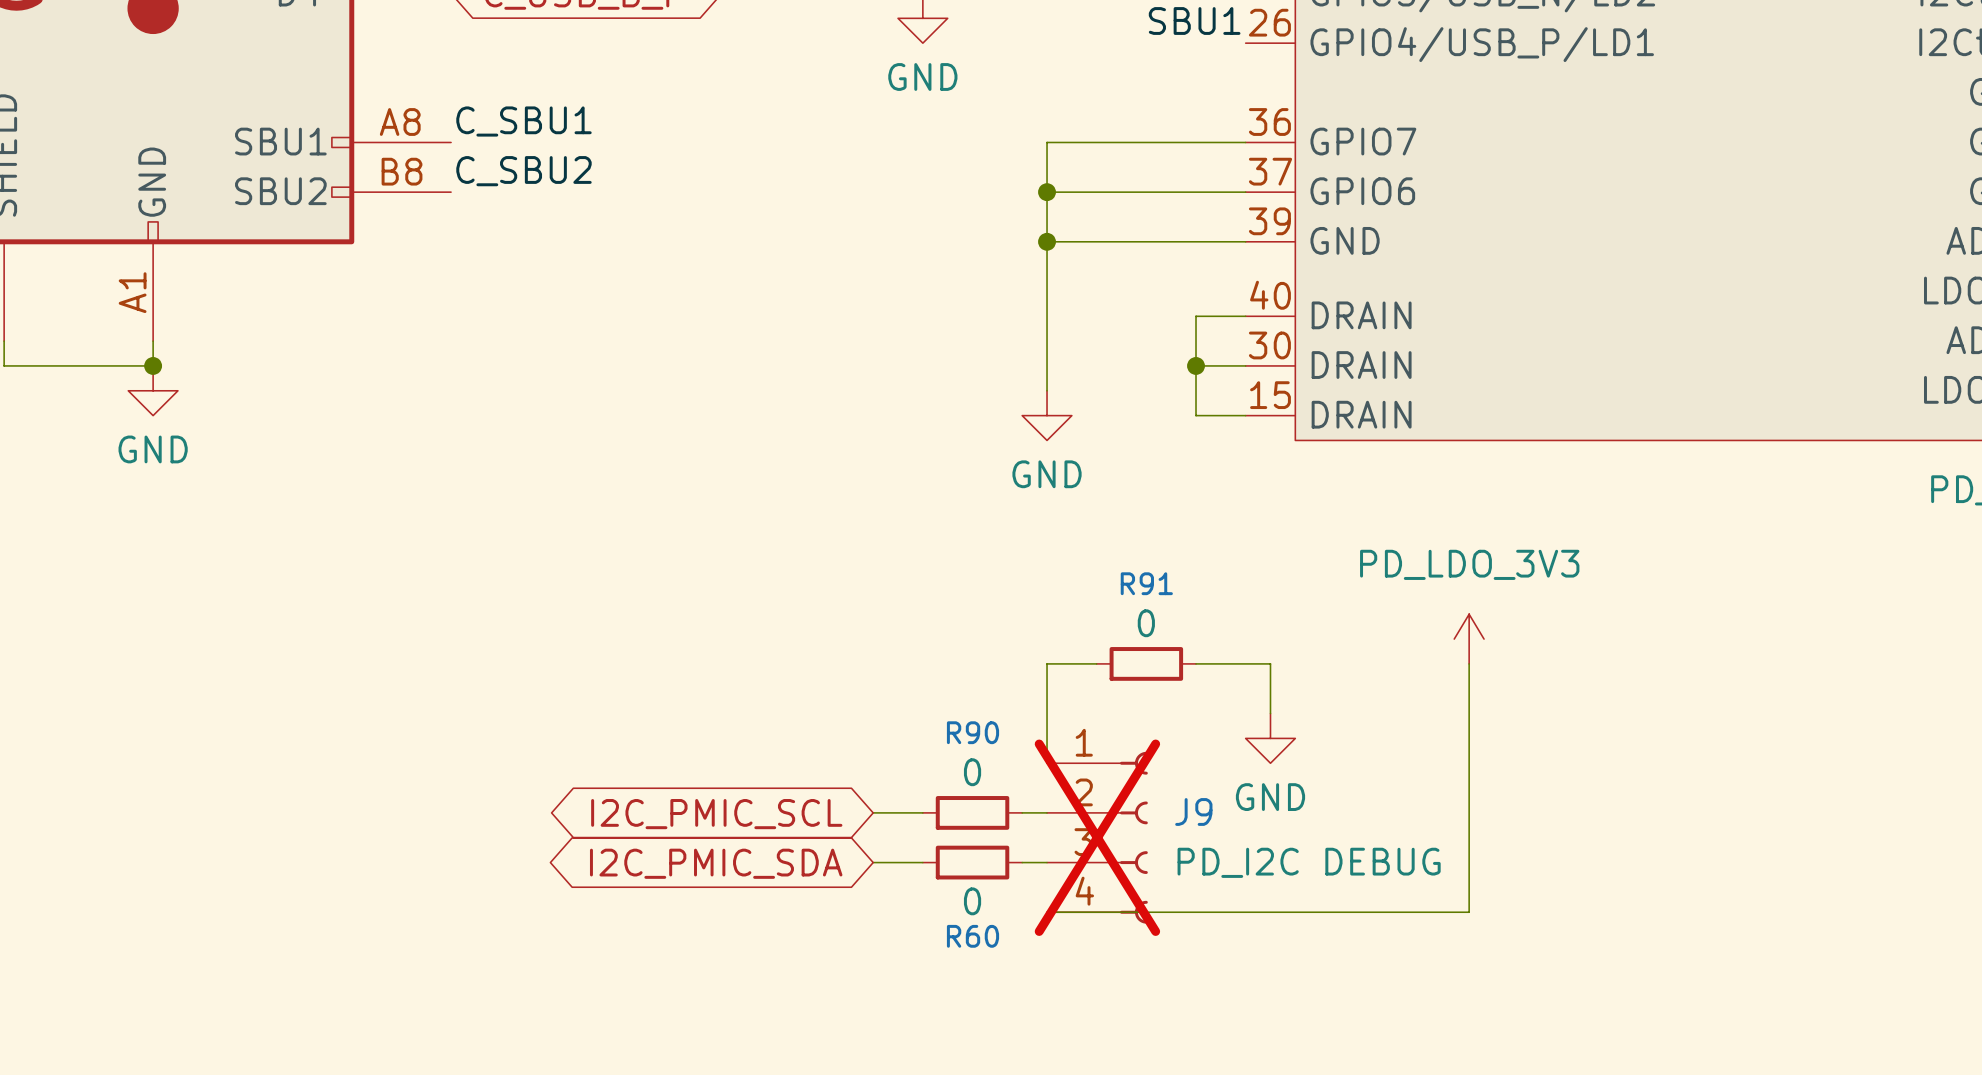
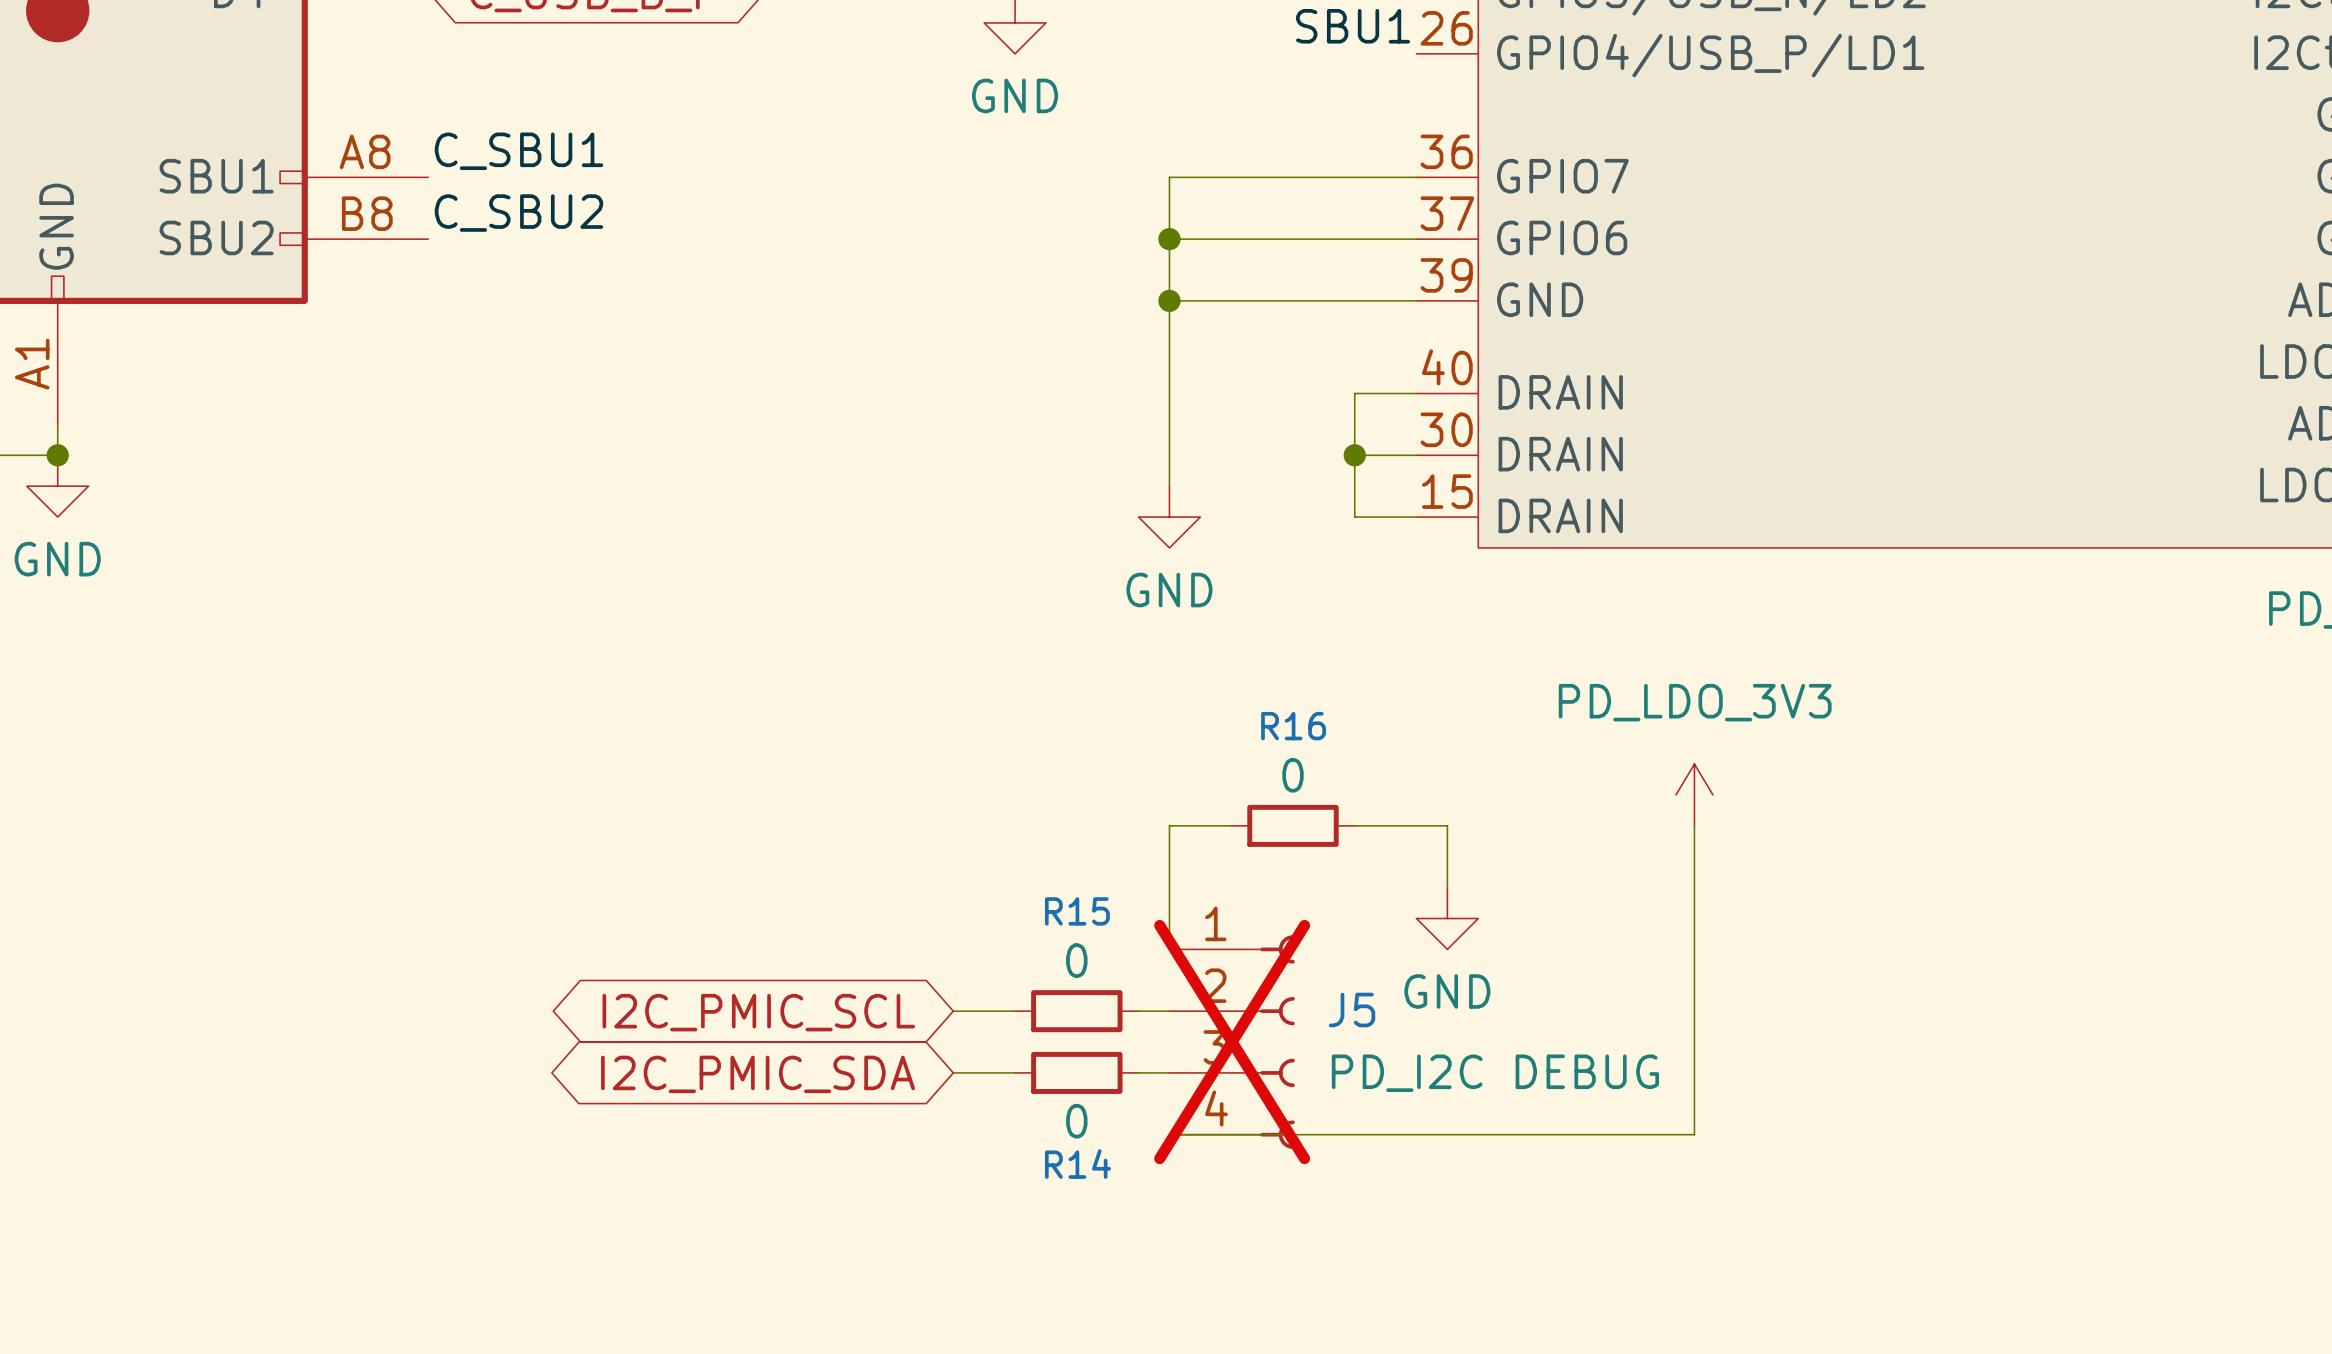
R91 name: R91 (1146, 583) -> R16 (1293, 726)
R90 name: R90 (973, 732) -> R15 (1077, 911)
J9 name: J9 (1193, 811) -> J5 (1352, 1010)
R60 name: R60 (973, 936) -> R14 (1077, 1164)

